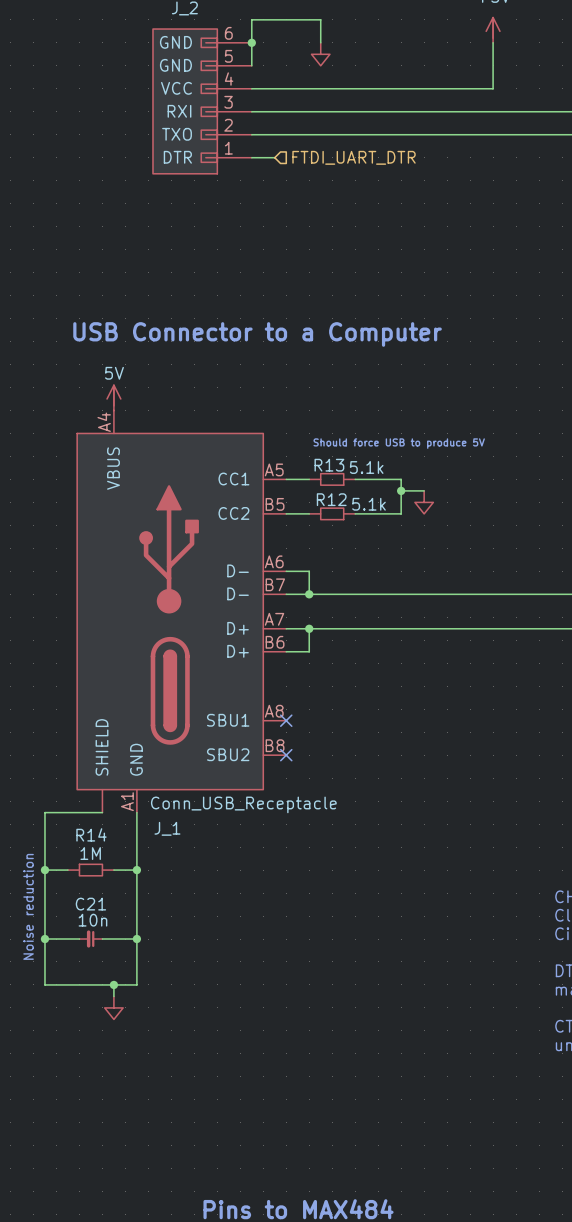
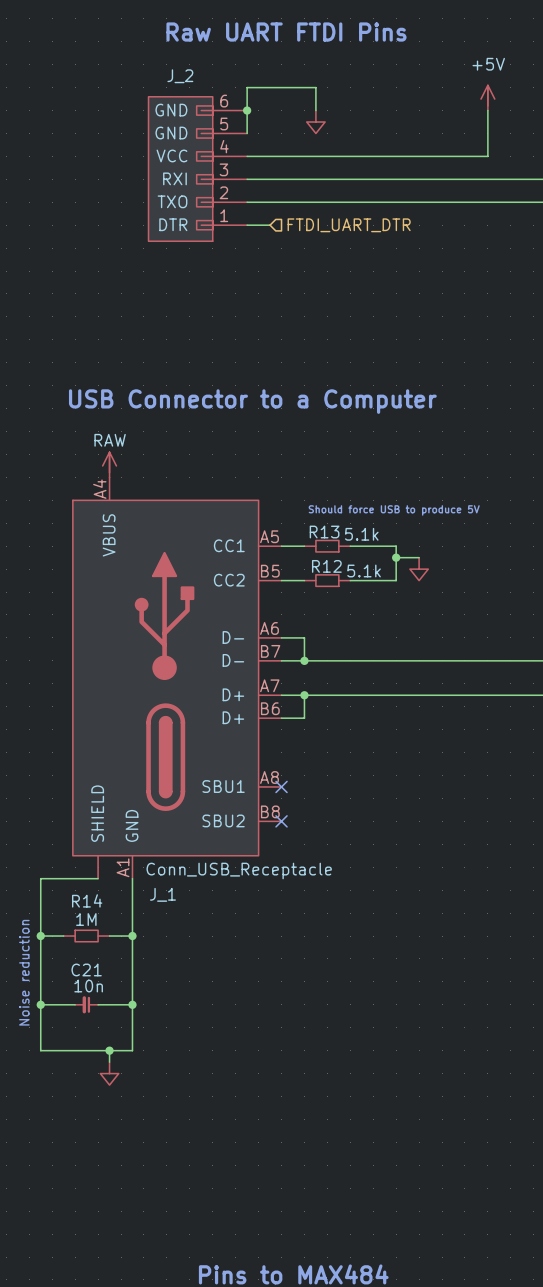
power symbol: 5V (113, 397) -> RAW (109, 464)

